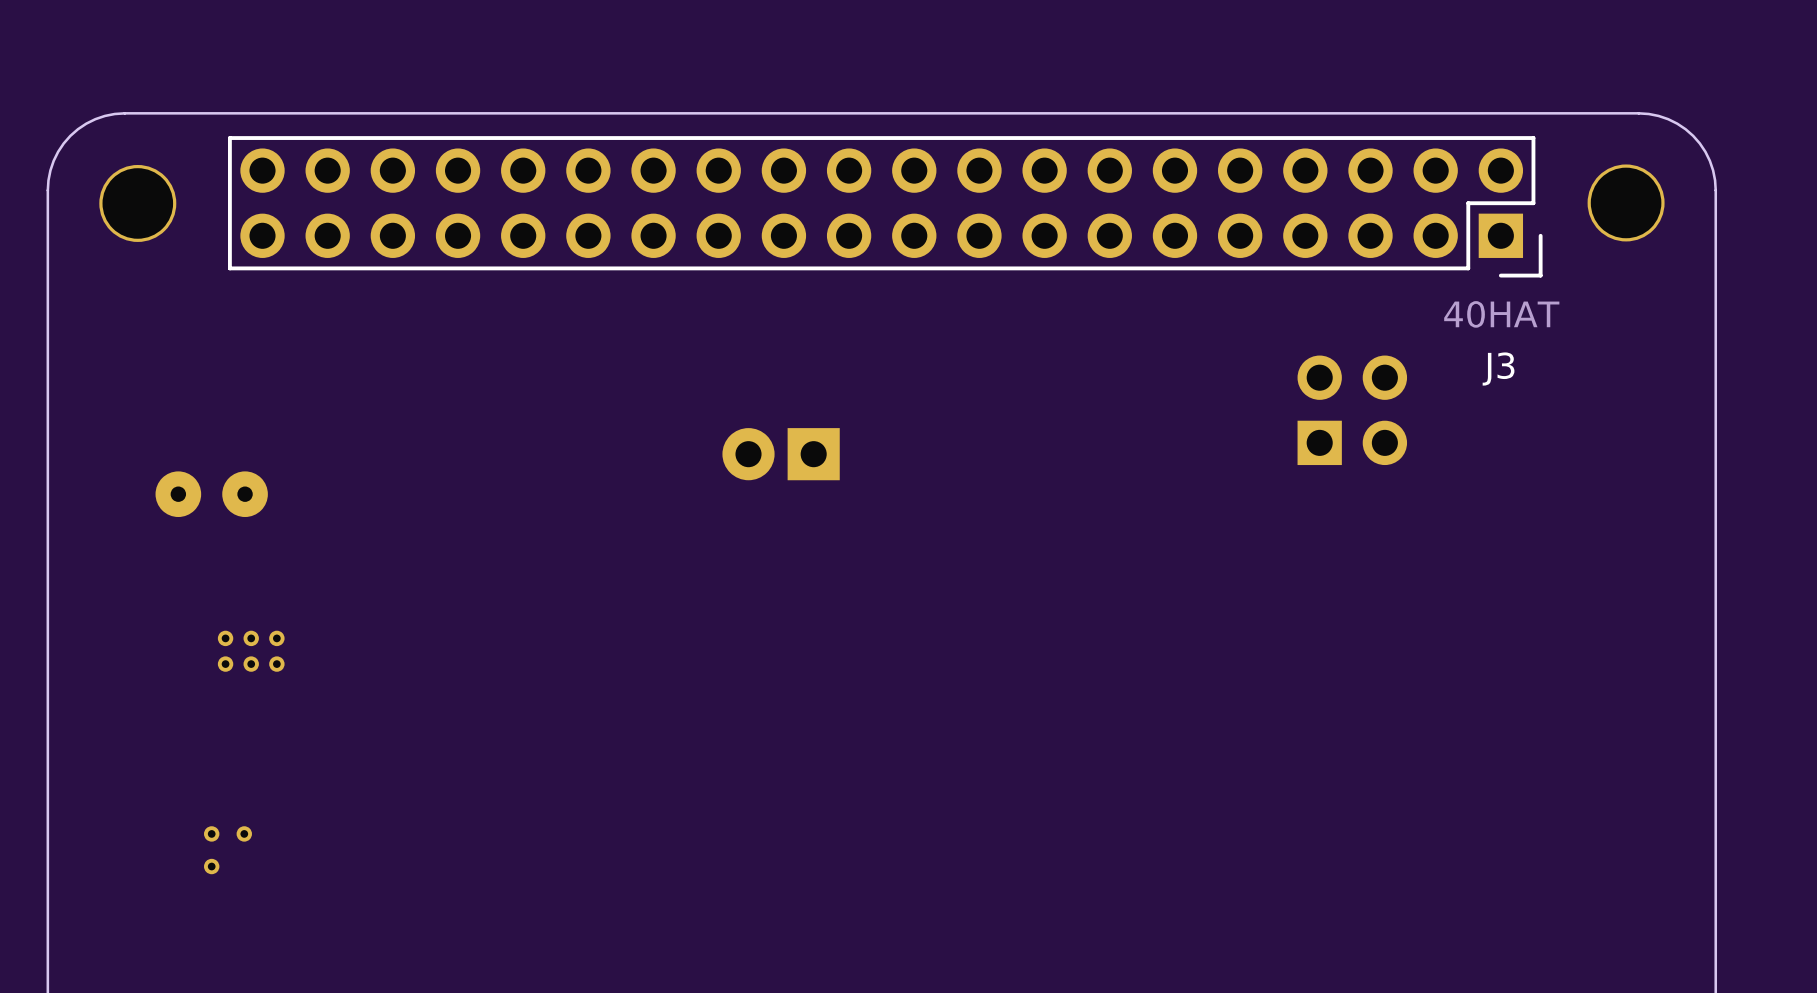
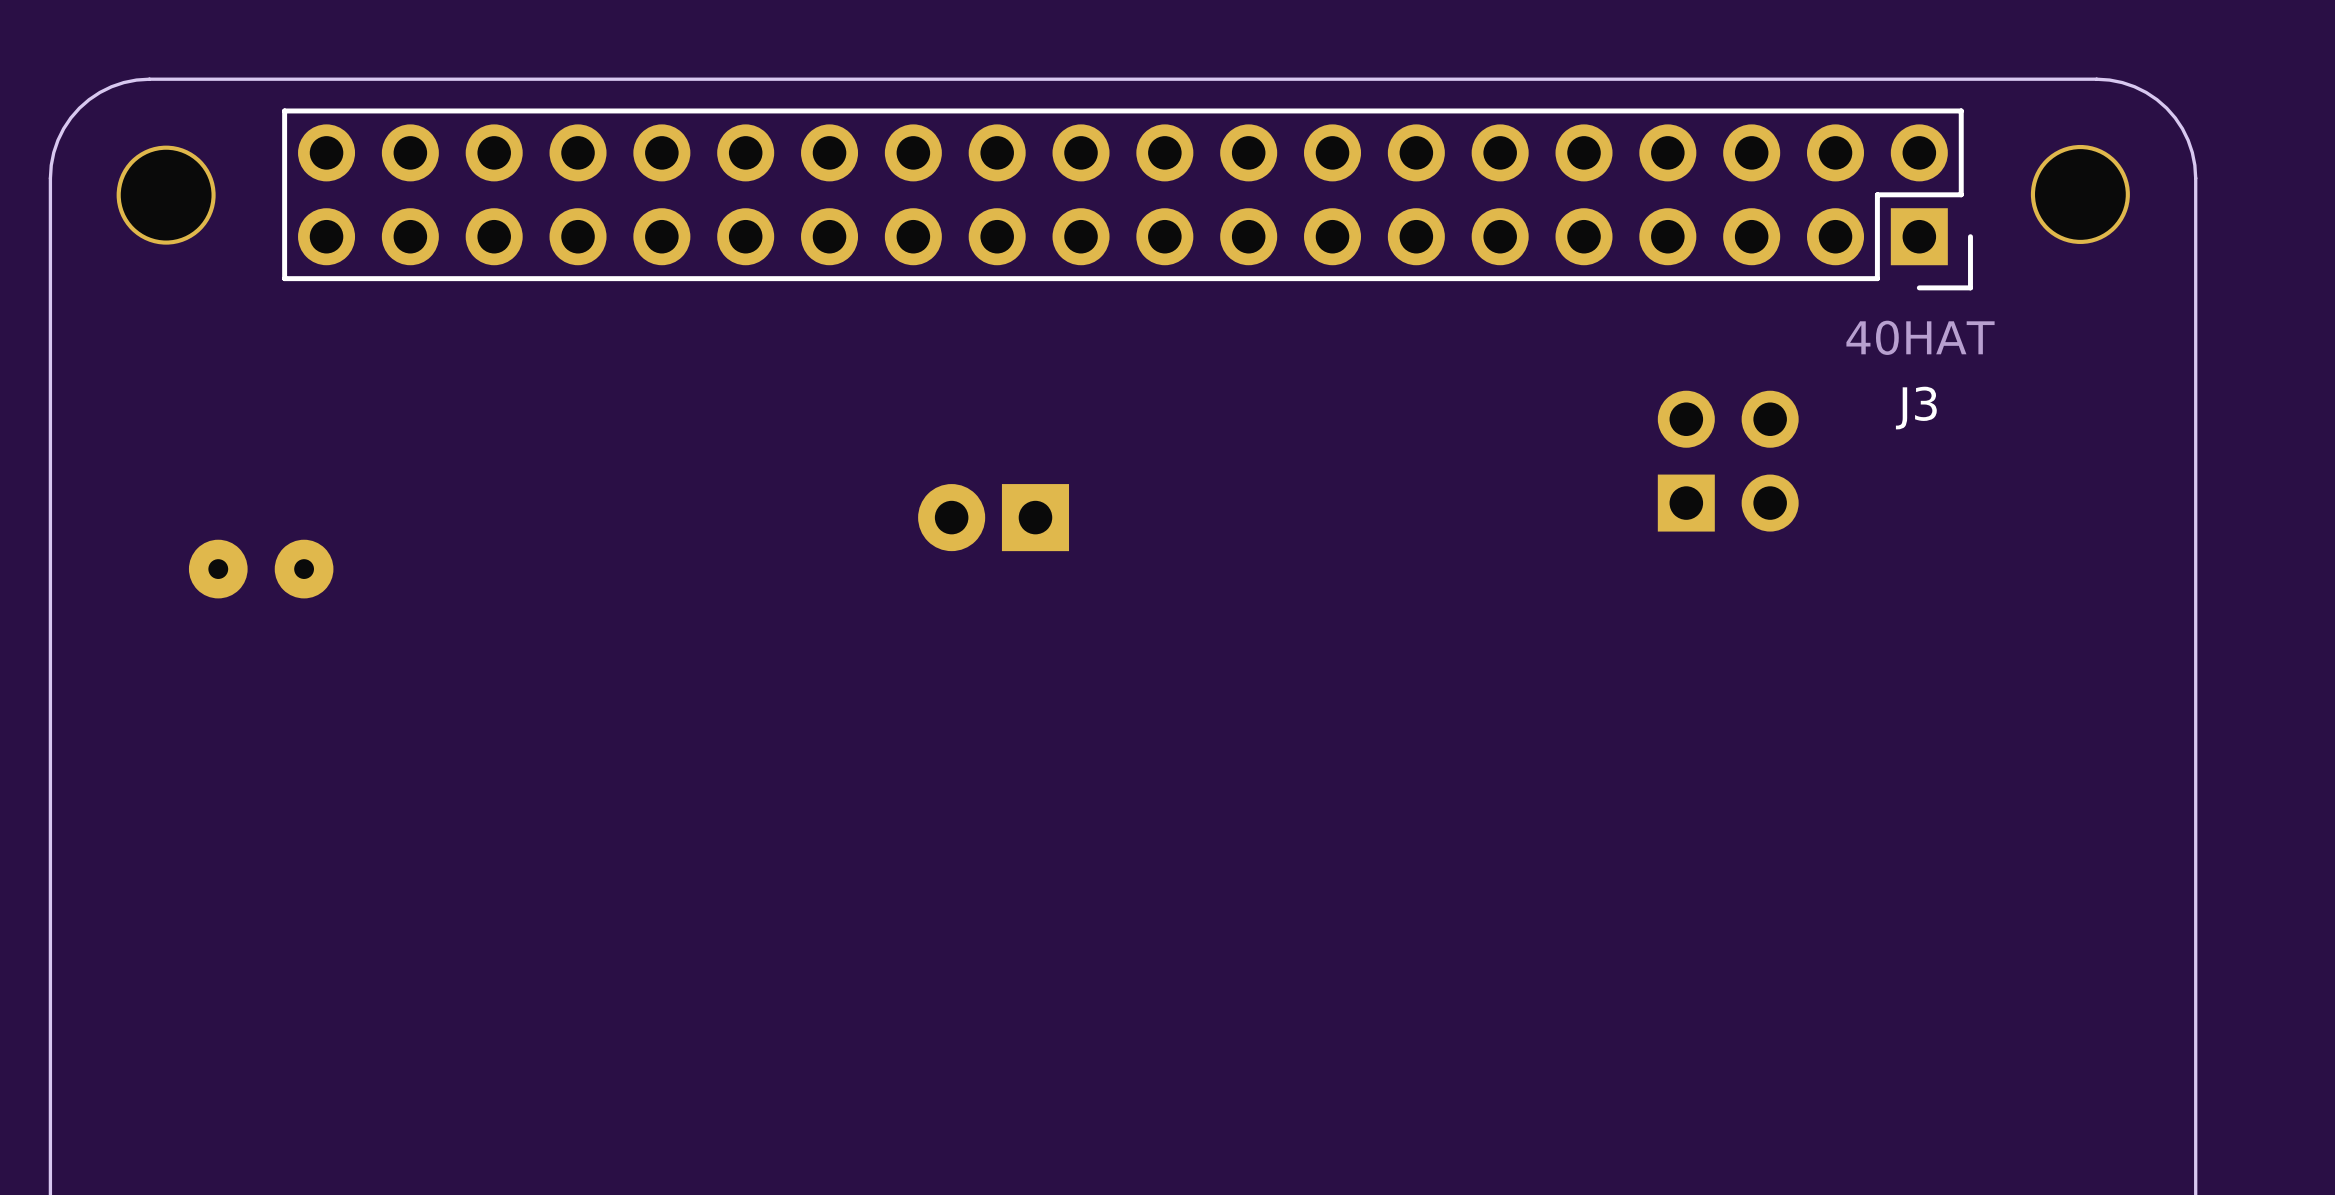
part: (225, 638) -> none
part: (251, 638) -> none
part: (276, 638) -> none
part: (225, 664) -> none
part: (251, 664) -> none
part: (276, 664) -> none
part: (211, 833) -> none
part: (244, 833) -> none
part: (211, 866) -> none

